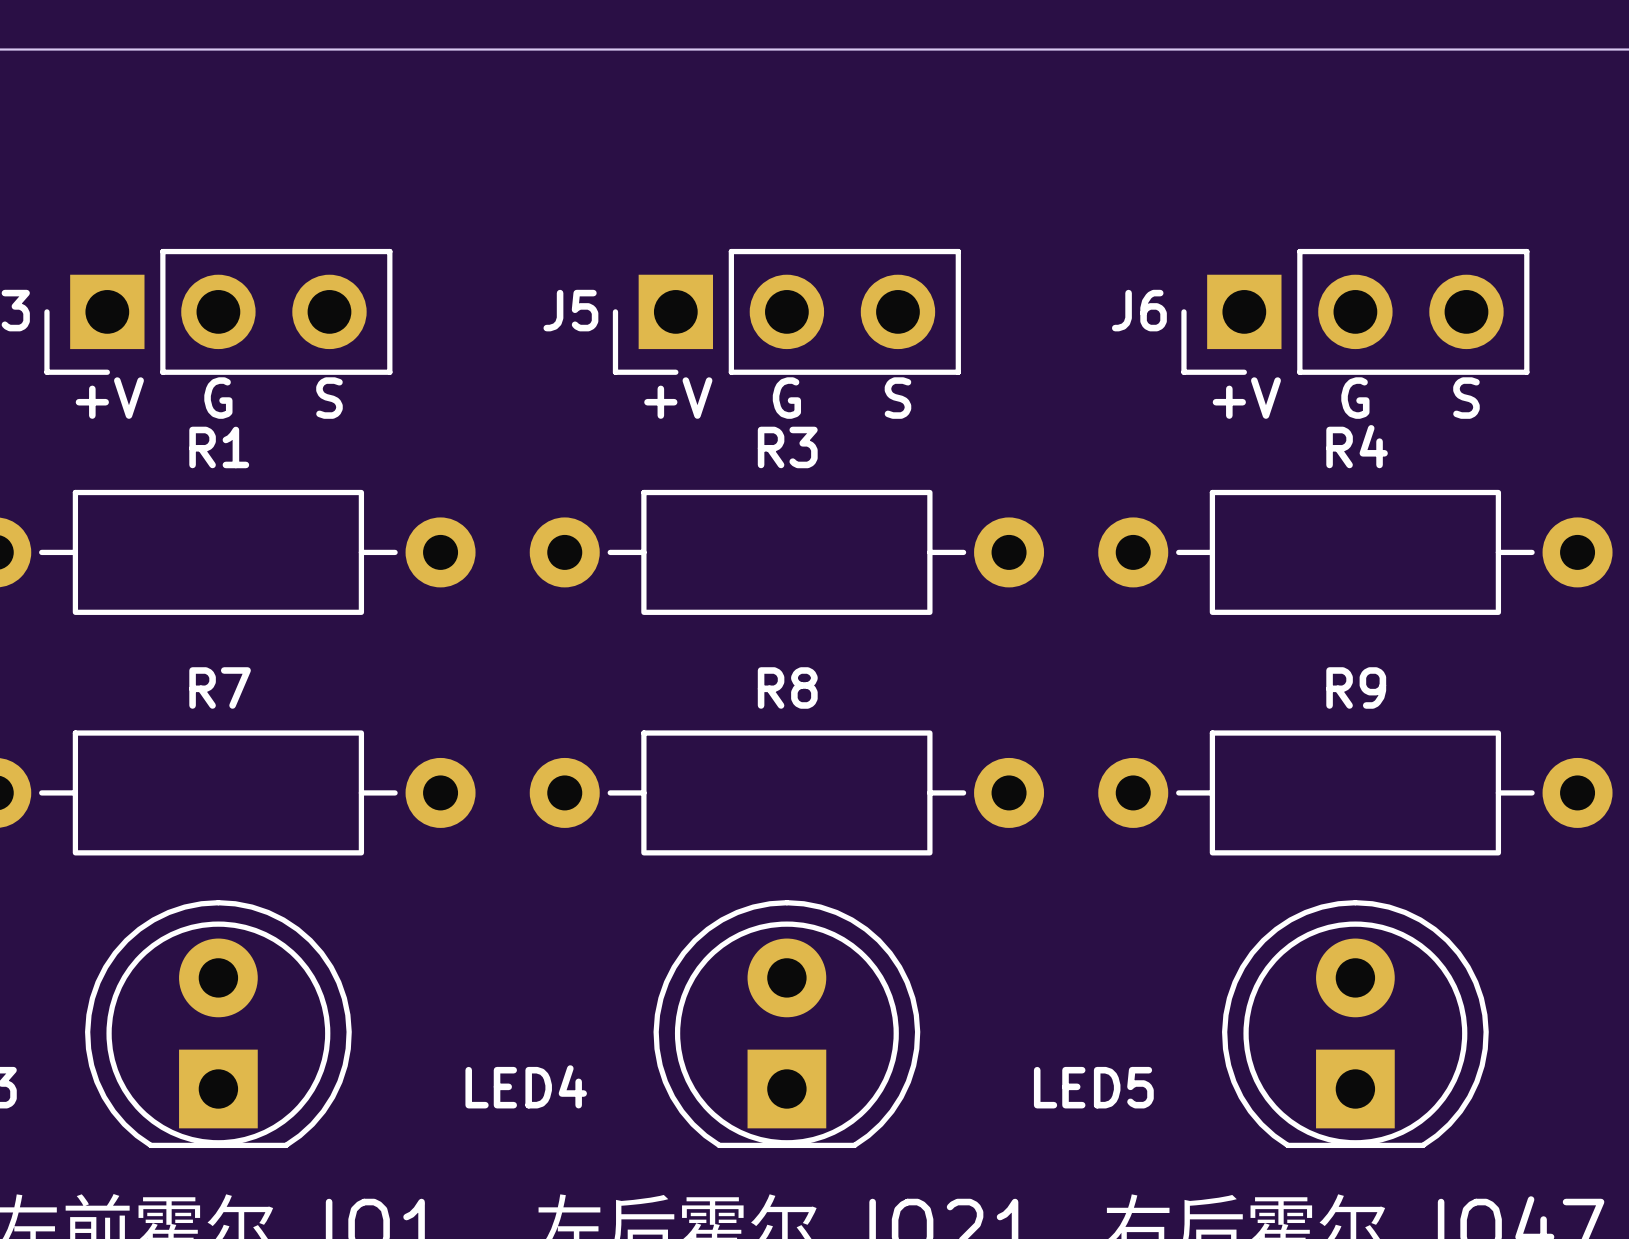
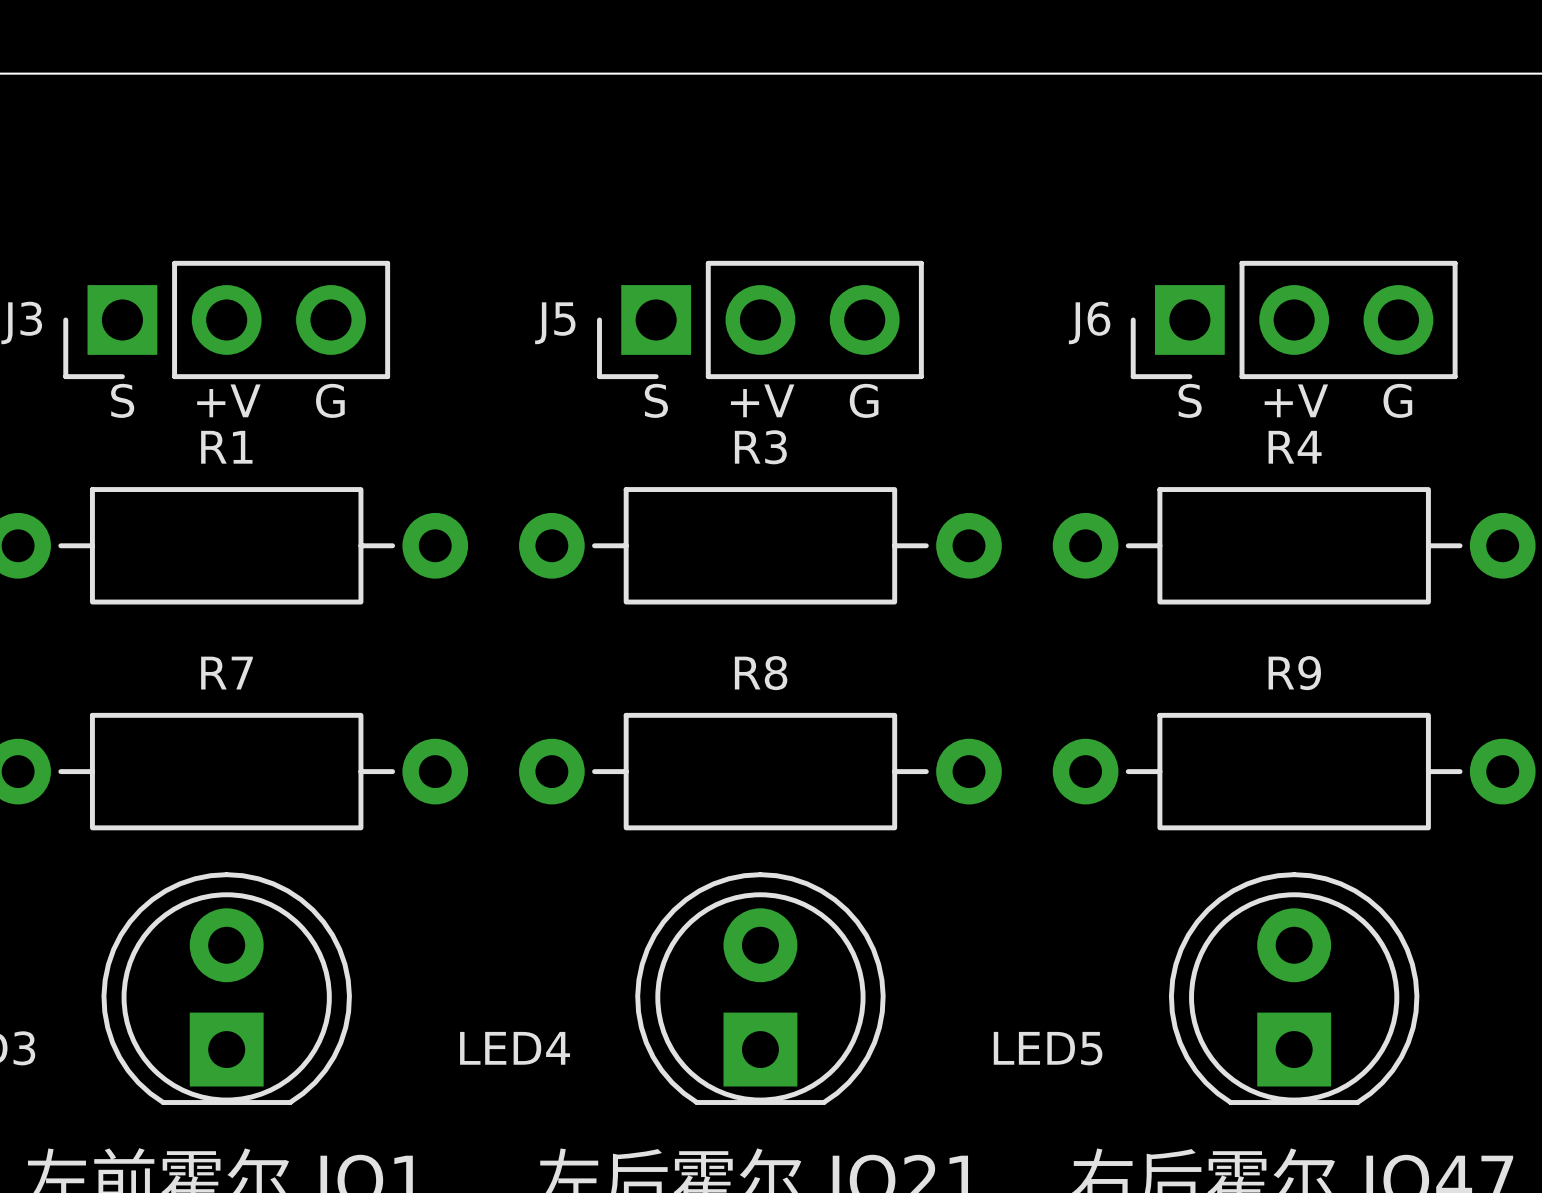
text: +V (109, 398) -> S (122, 400)
text: G (218, 398) -> +V (228, 400)
text: S (329, 398) -> G (330, 400)
text: +V (678, 398) -> S (656, 400)
text: G (786, 398) -> +V (762, 400)
text: S (897, 398) -> G (864, 400)
text: +V (1246, 398) -> S (1190, 400)
text: G (1355, 398) -> +V (1296, 400)
text: S (1466, 398) -> G (1397, 400)

